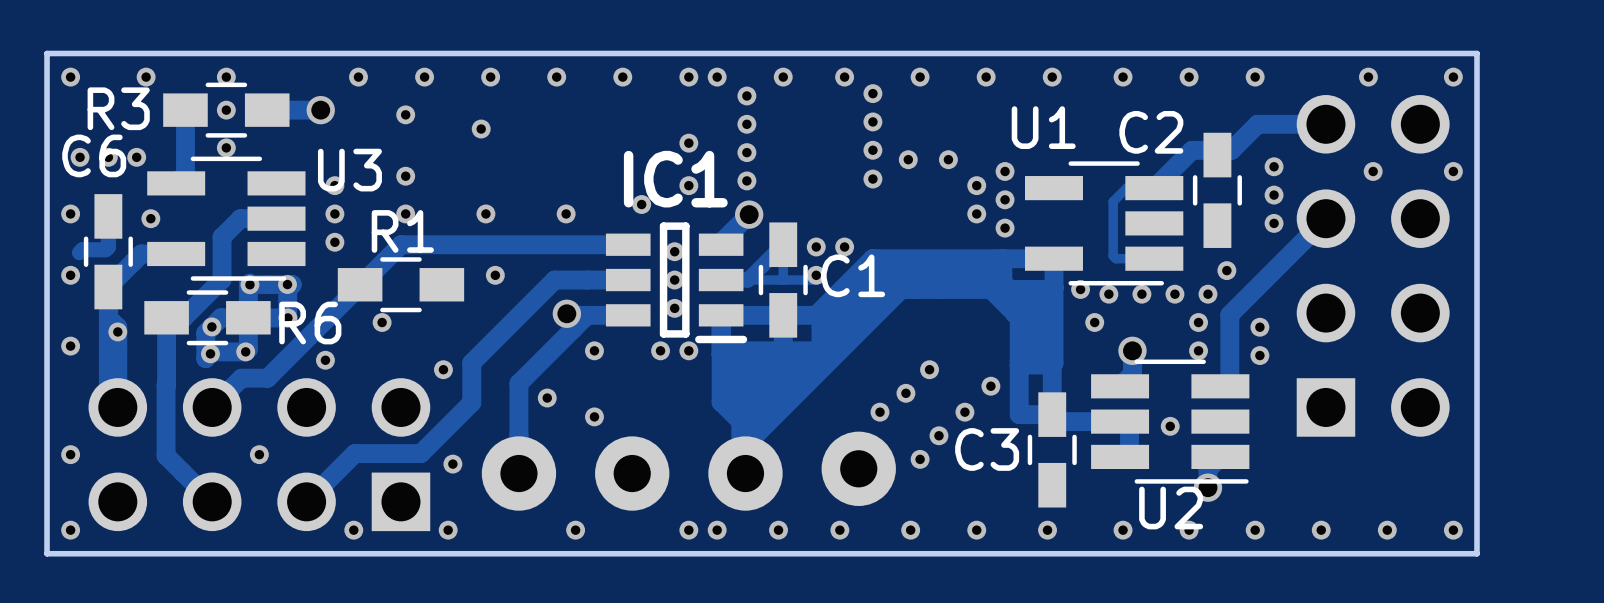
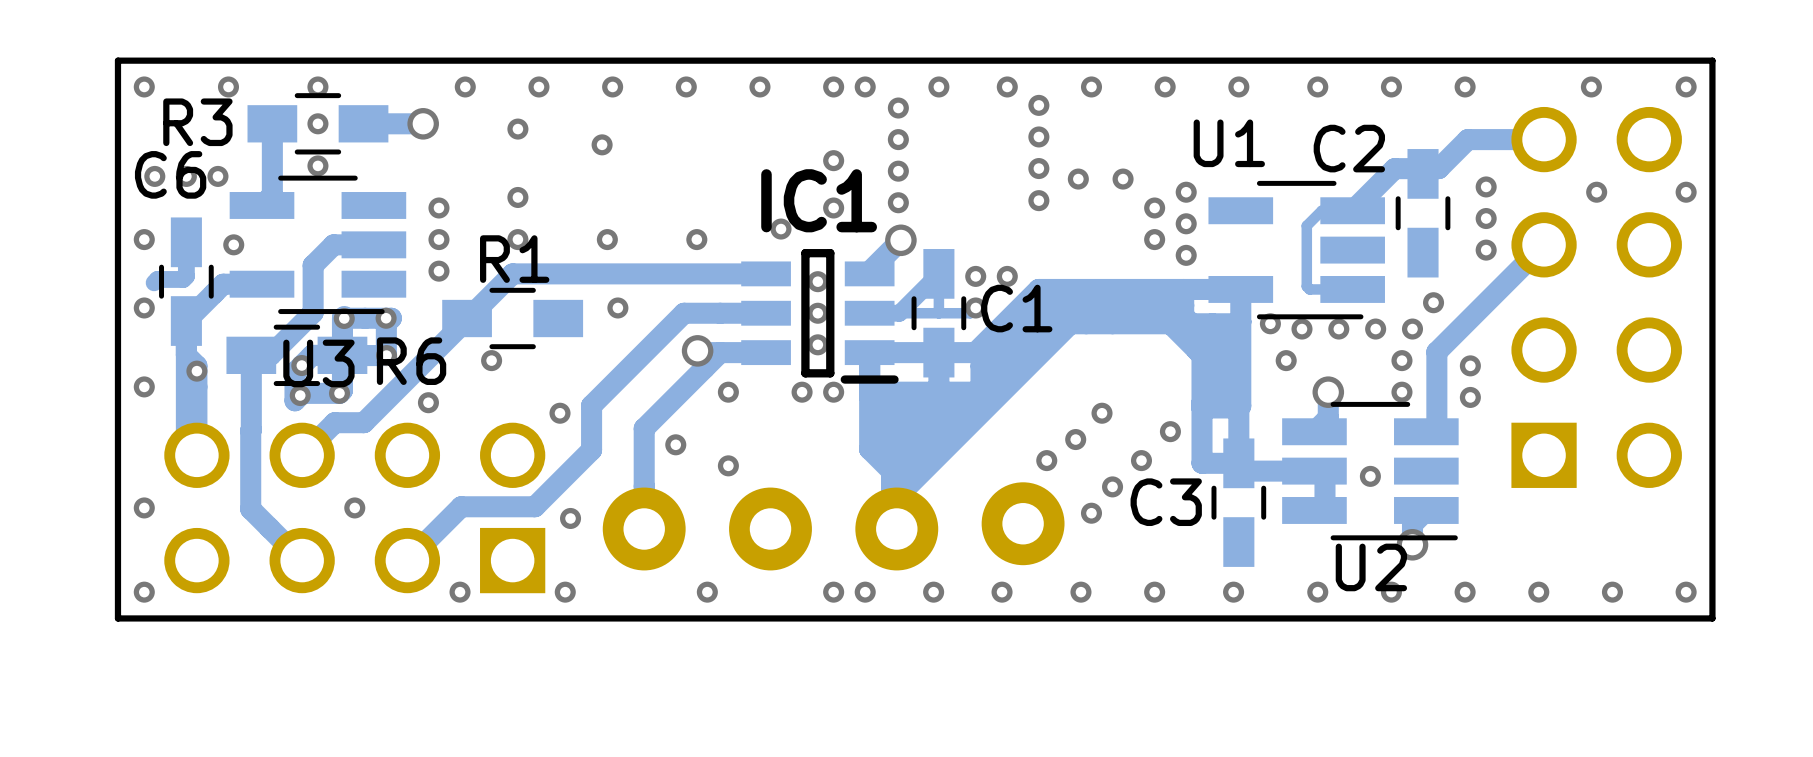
U3 name position: U3 (349, 170) -> U3 (318, 363)

